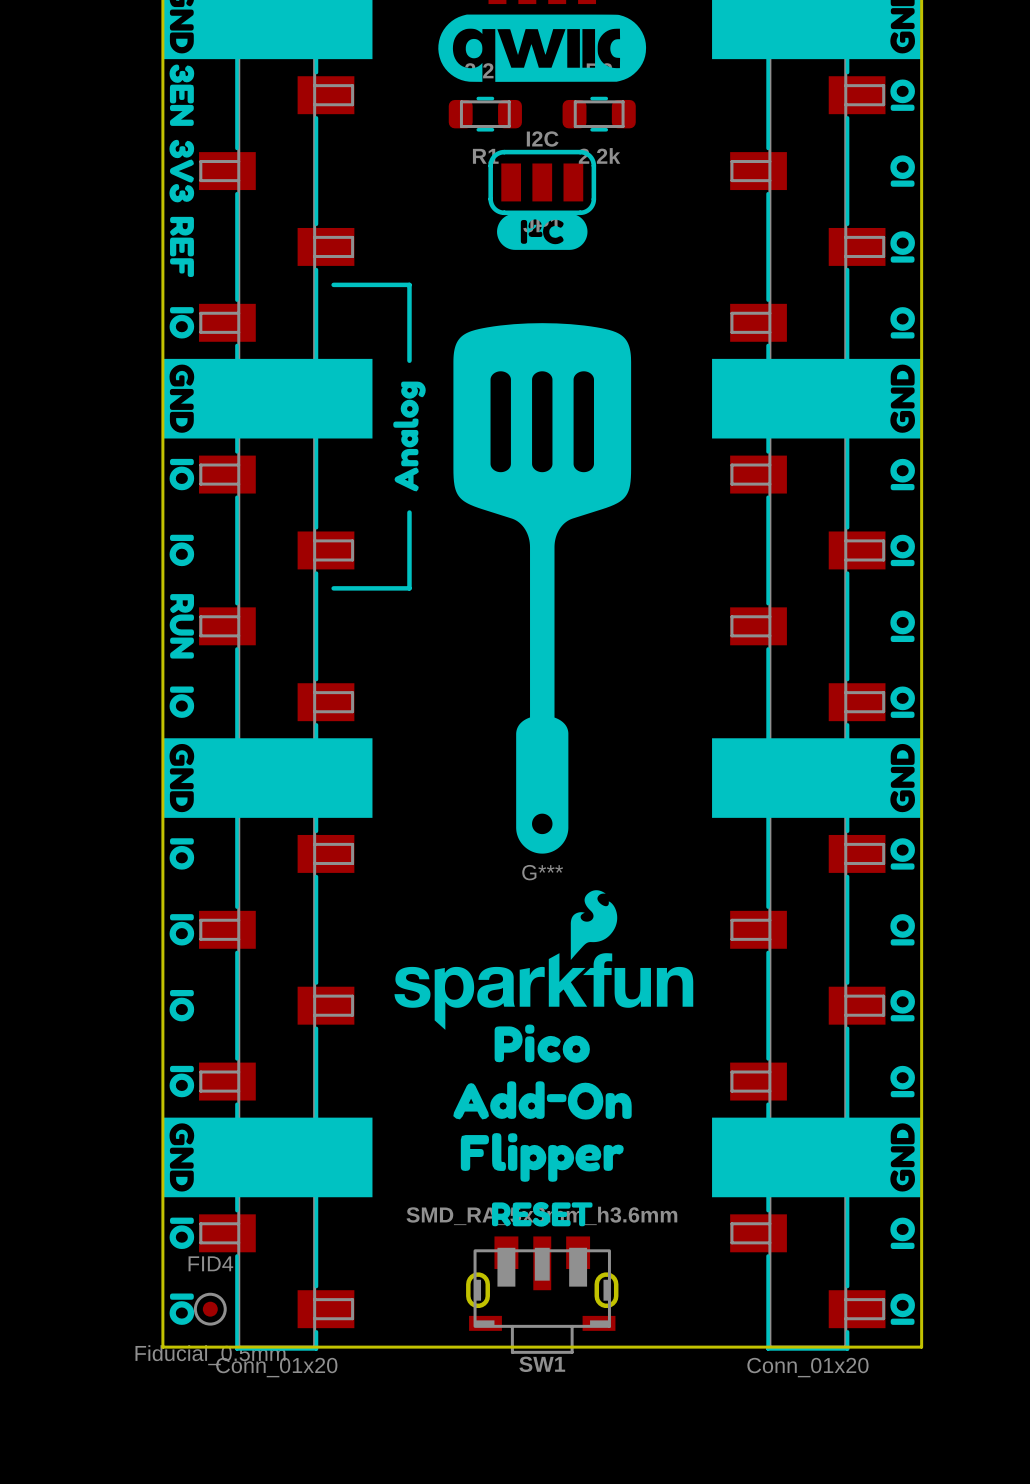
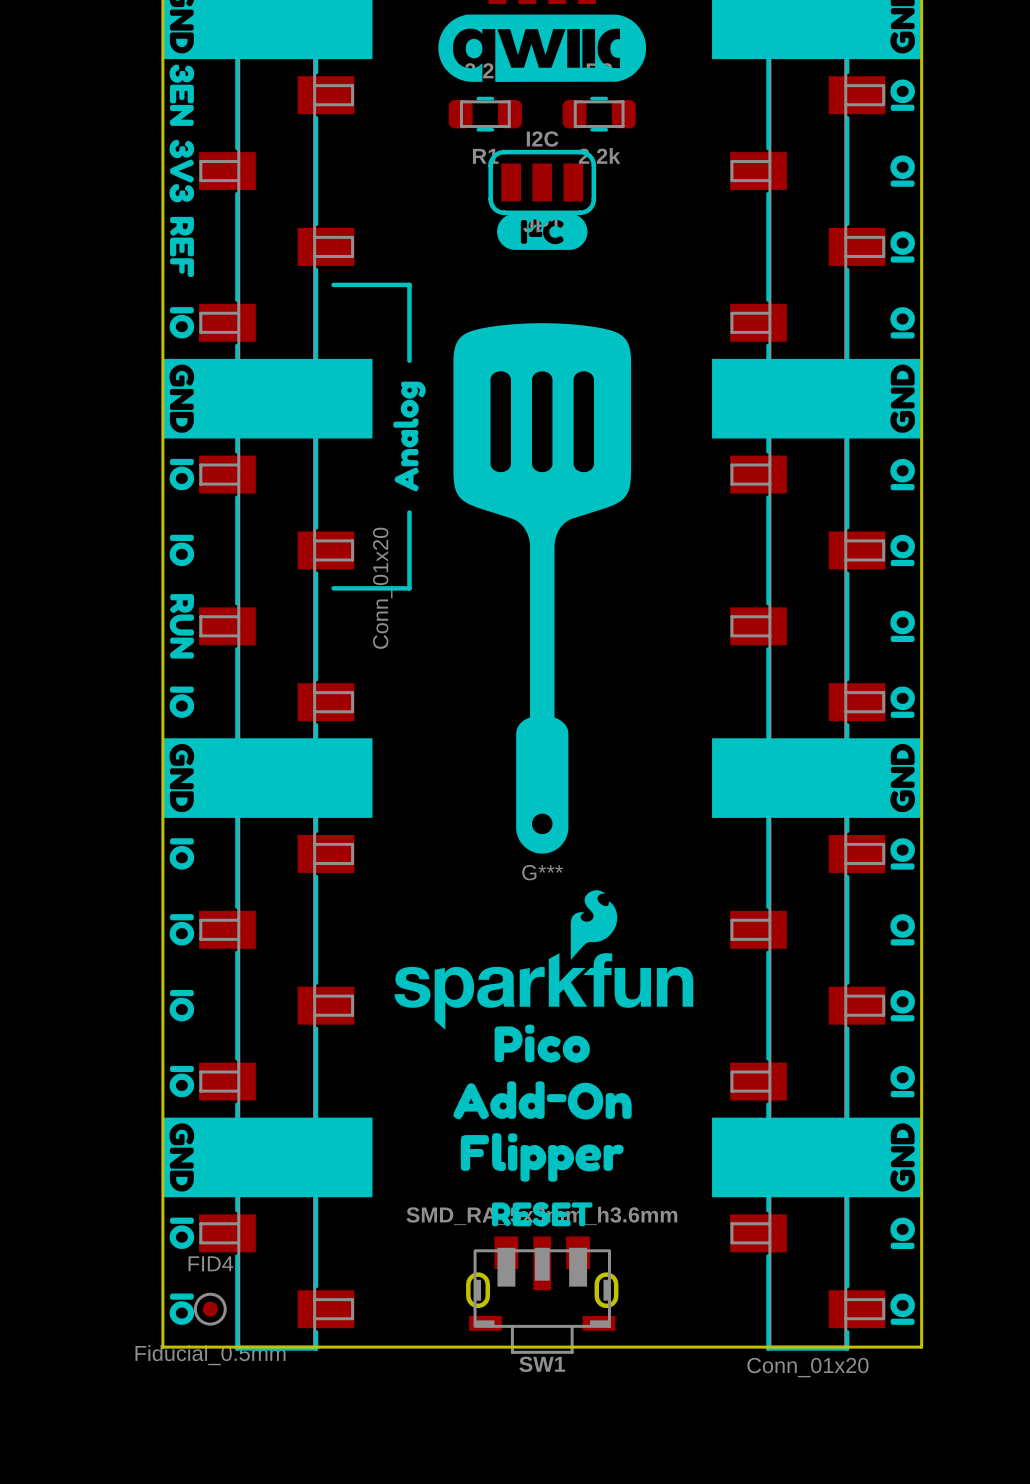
part value rotation: 0° (276, 1367) -> 90° counterclockwise (382, 588)
part value position: Conn_01x20 (276, 1367) -> Conn_01x20 (382, 588)

